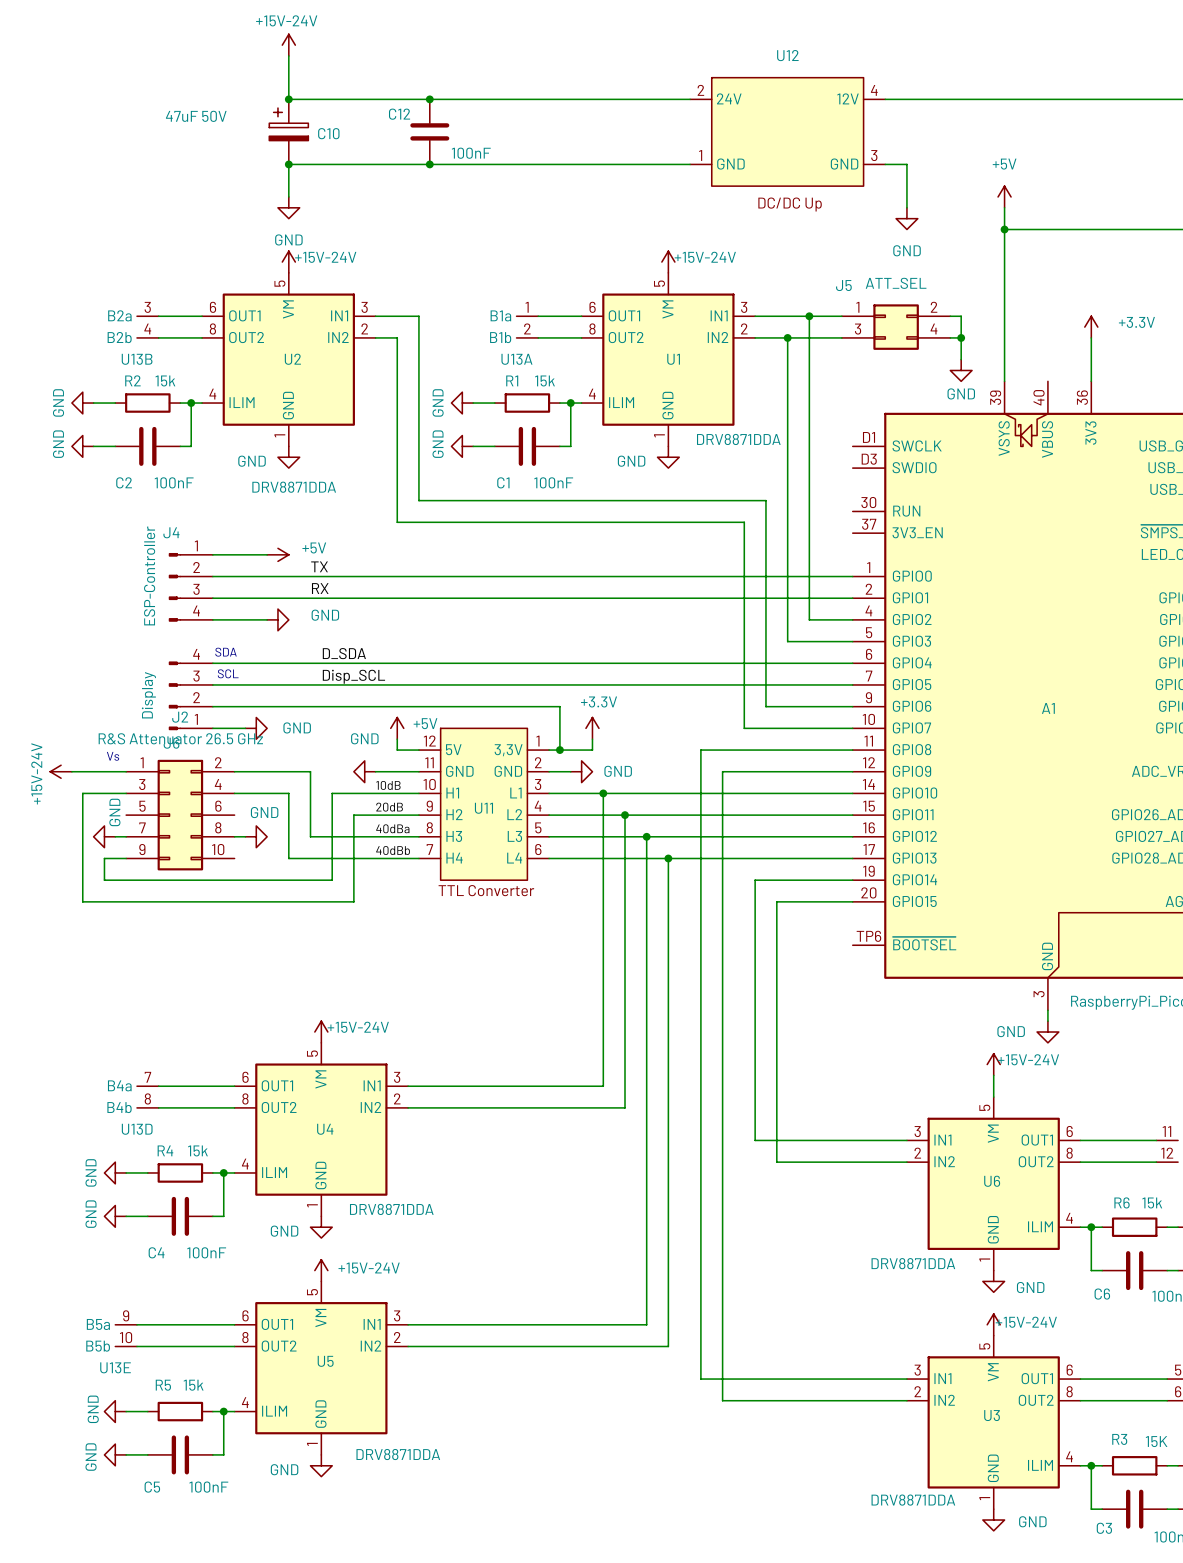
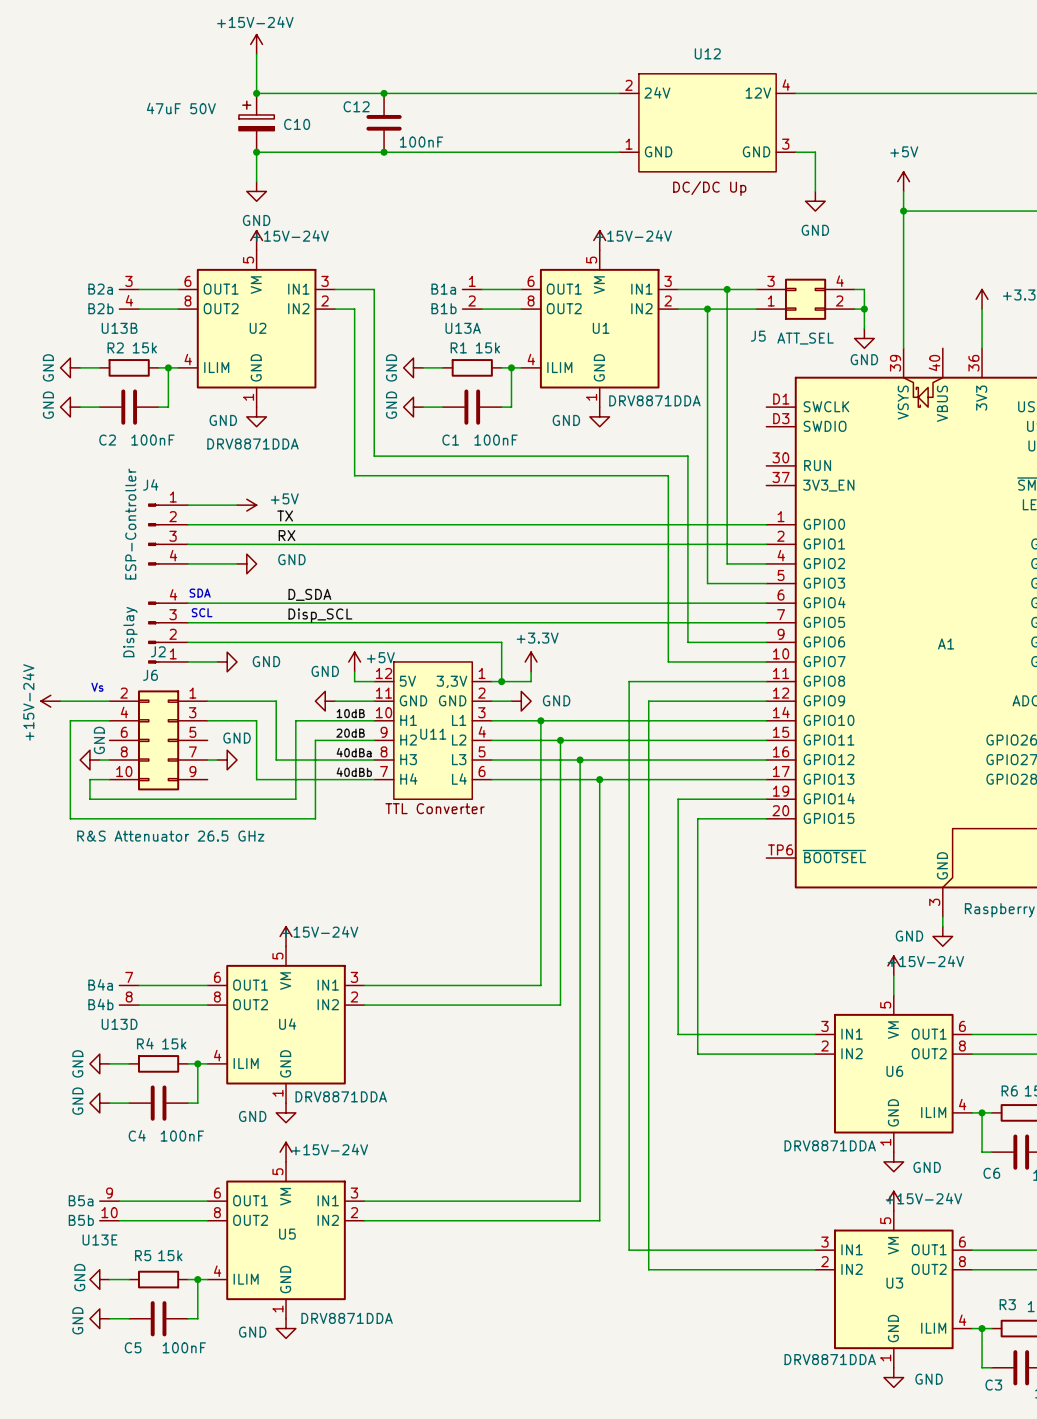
J5 flip: as is (896, 327) -> up-down (805, 299)
J2 value position: R&S Attenuator 26.5 GHz (180, 738) -> R&S Attenuator 26.5 GHz (170, 836)
J2 flip: as is (180, 815) -> left-right (158, 740)

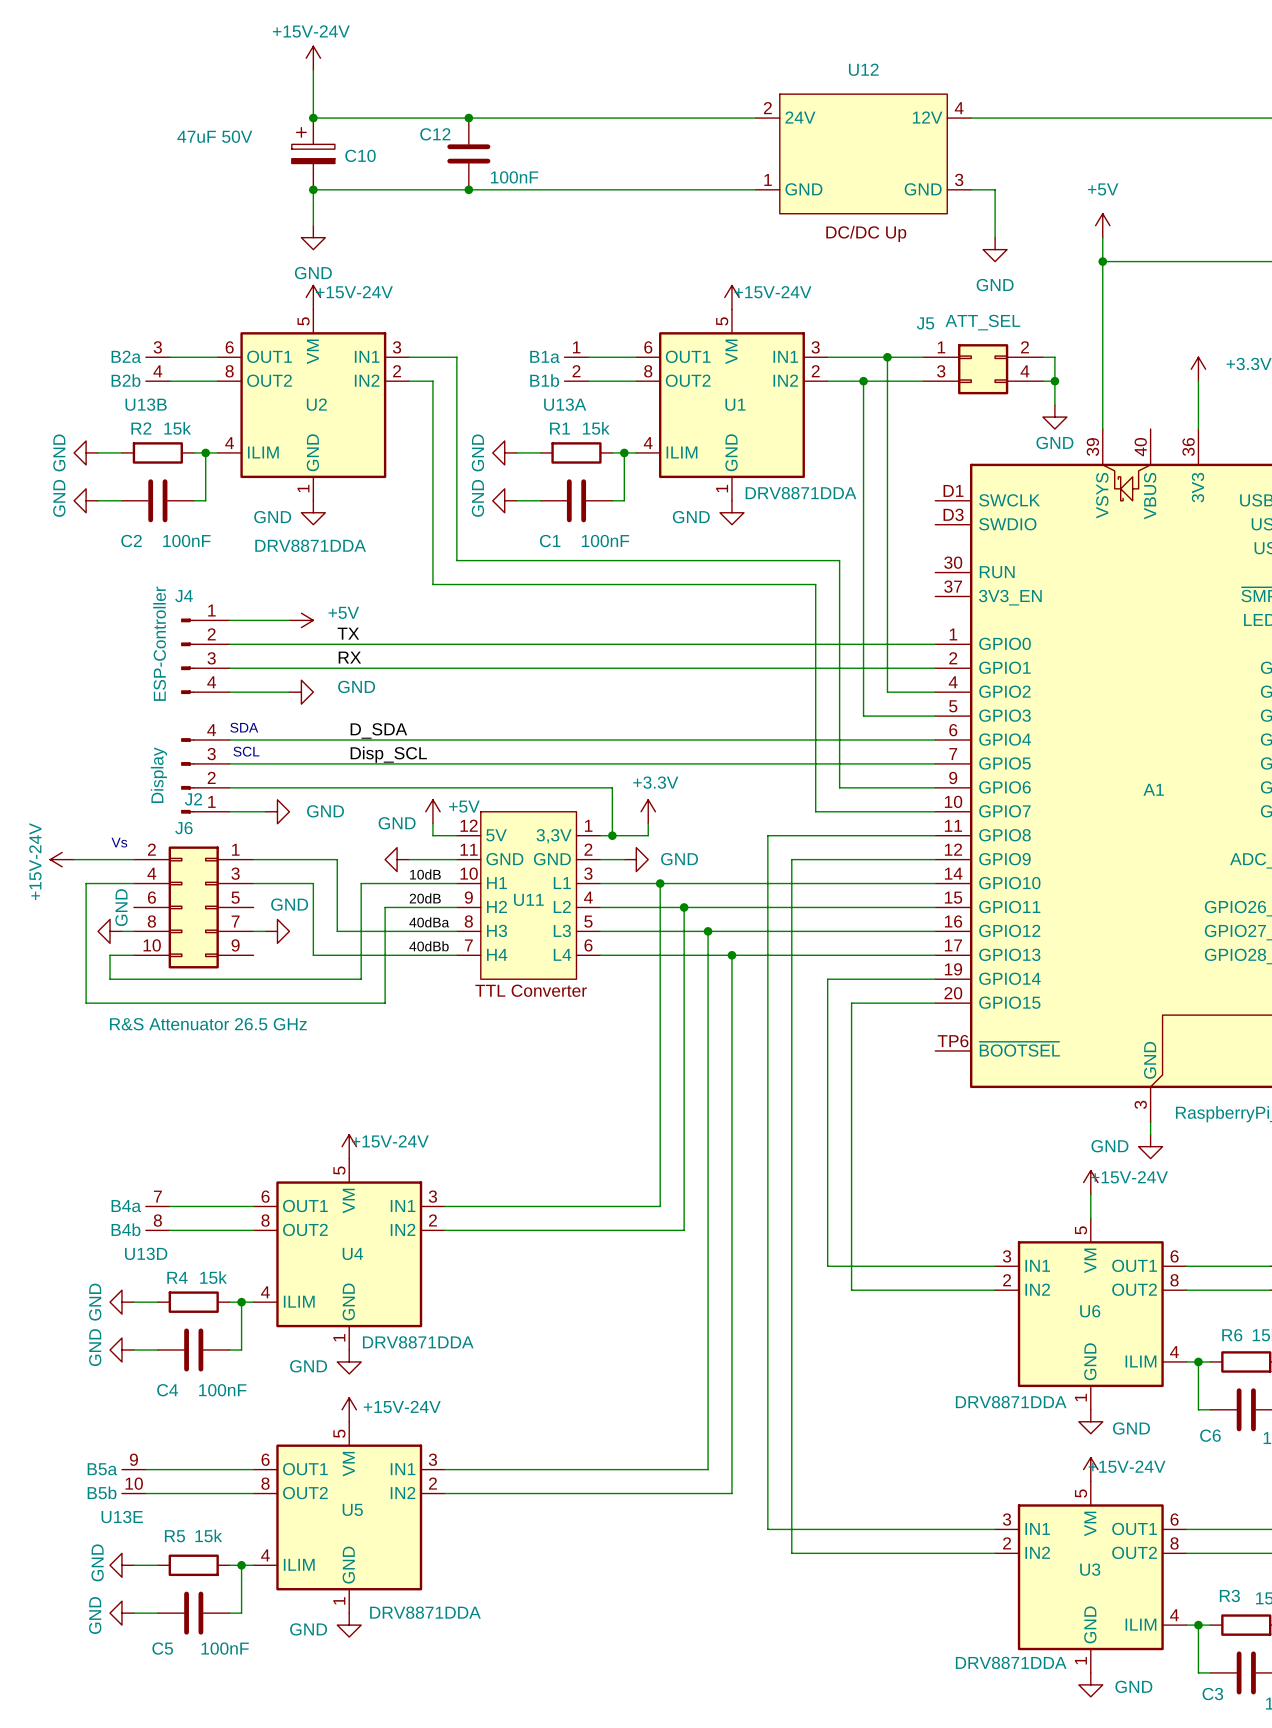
J5 flip: as is (805, 299) -> up-down (983, 369)

